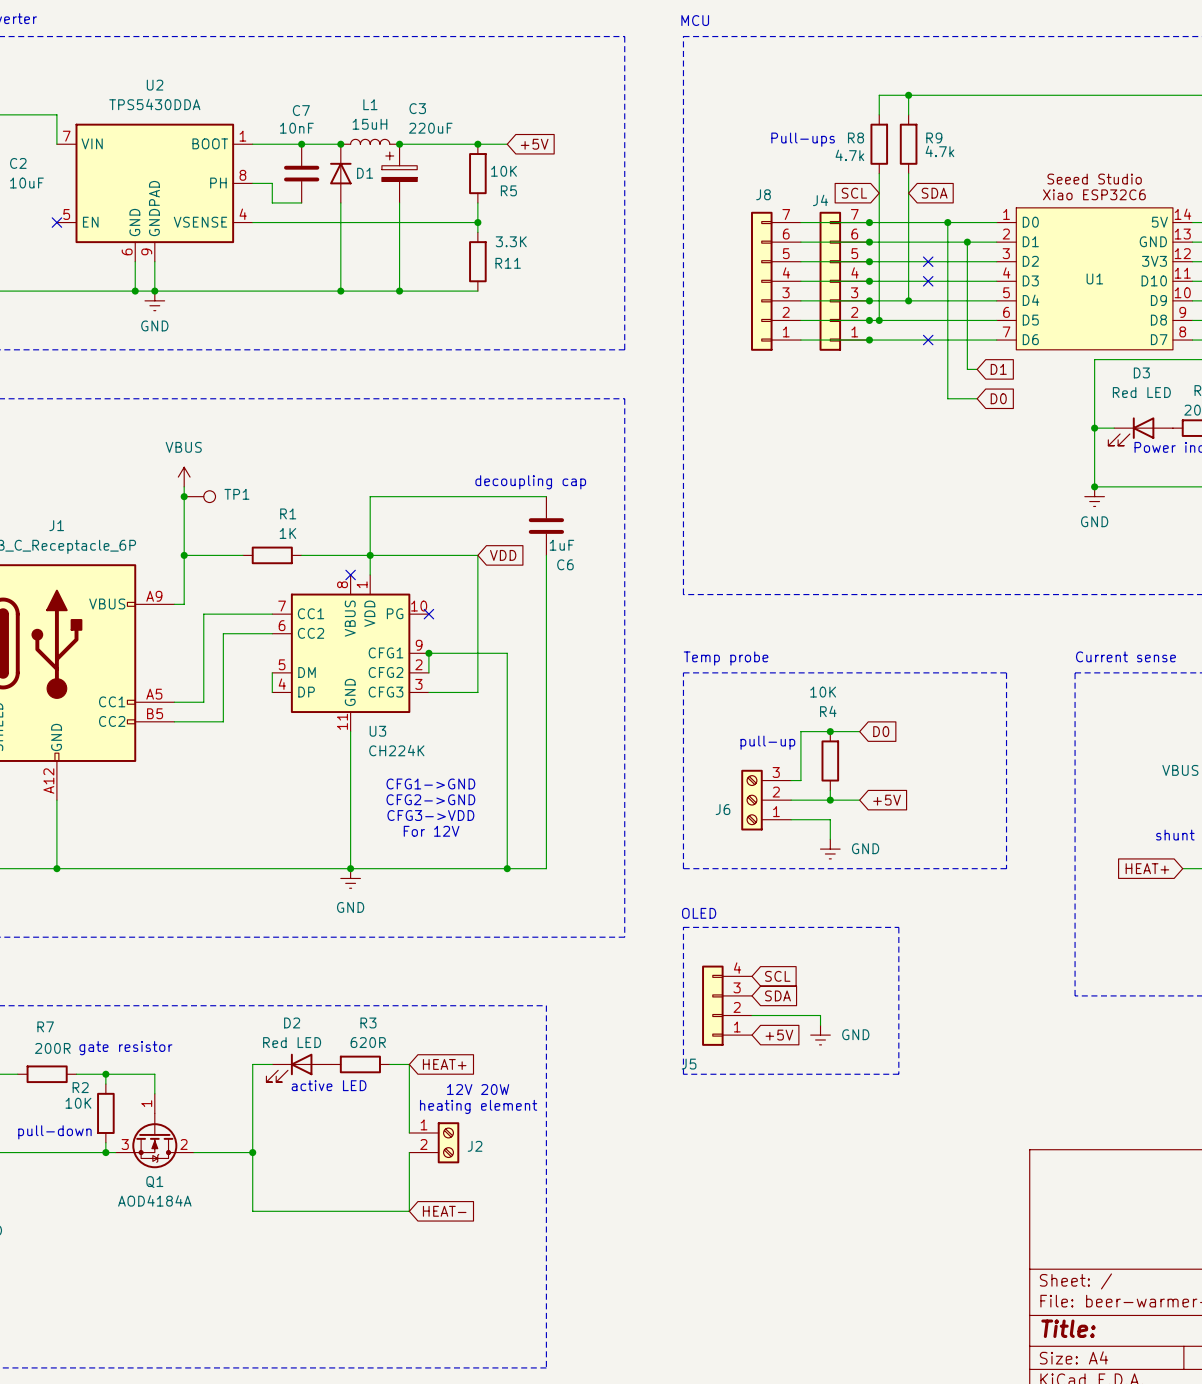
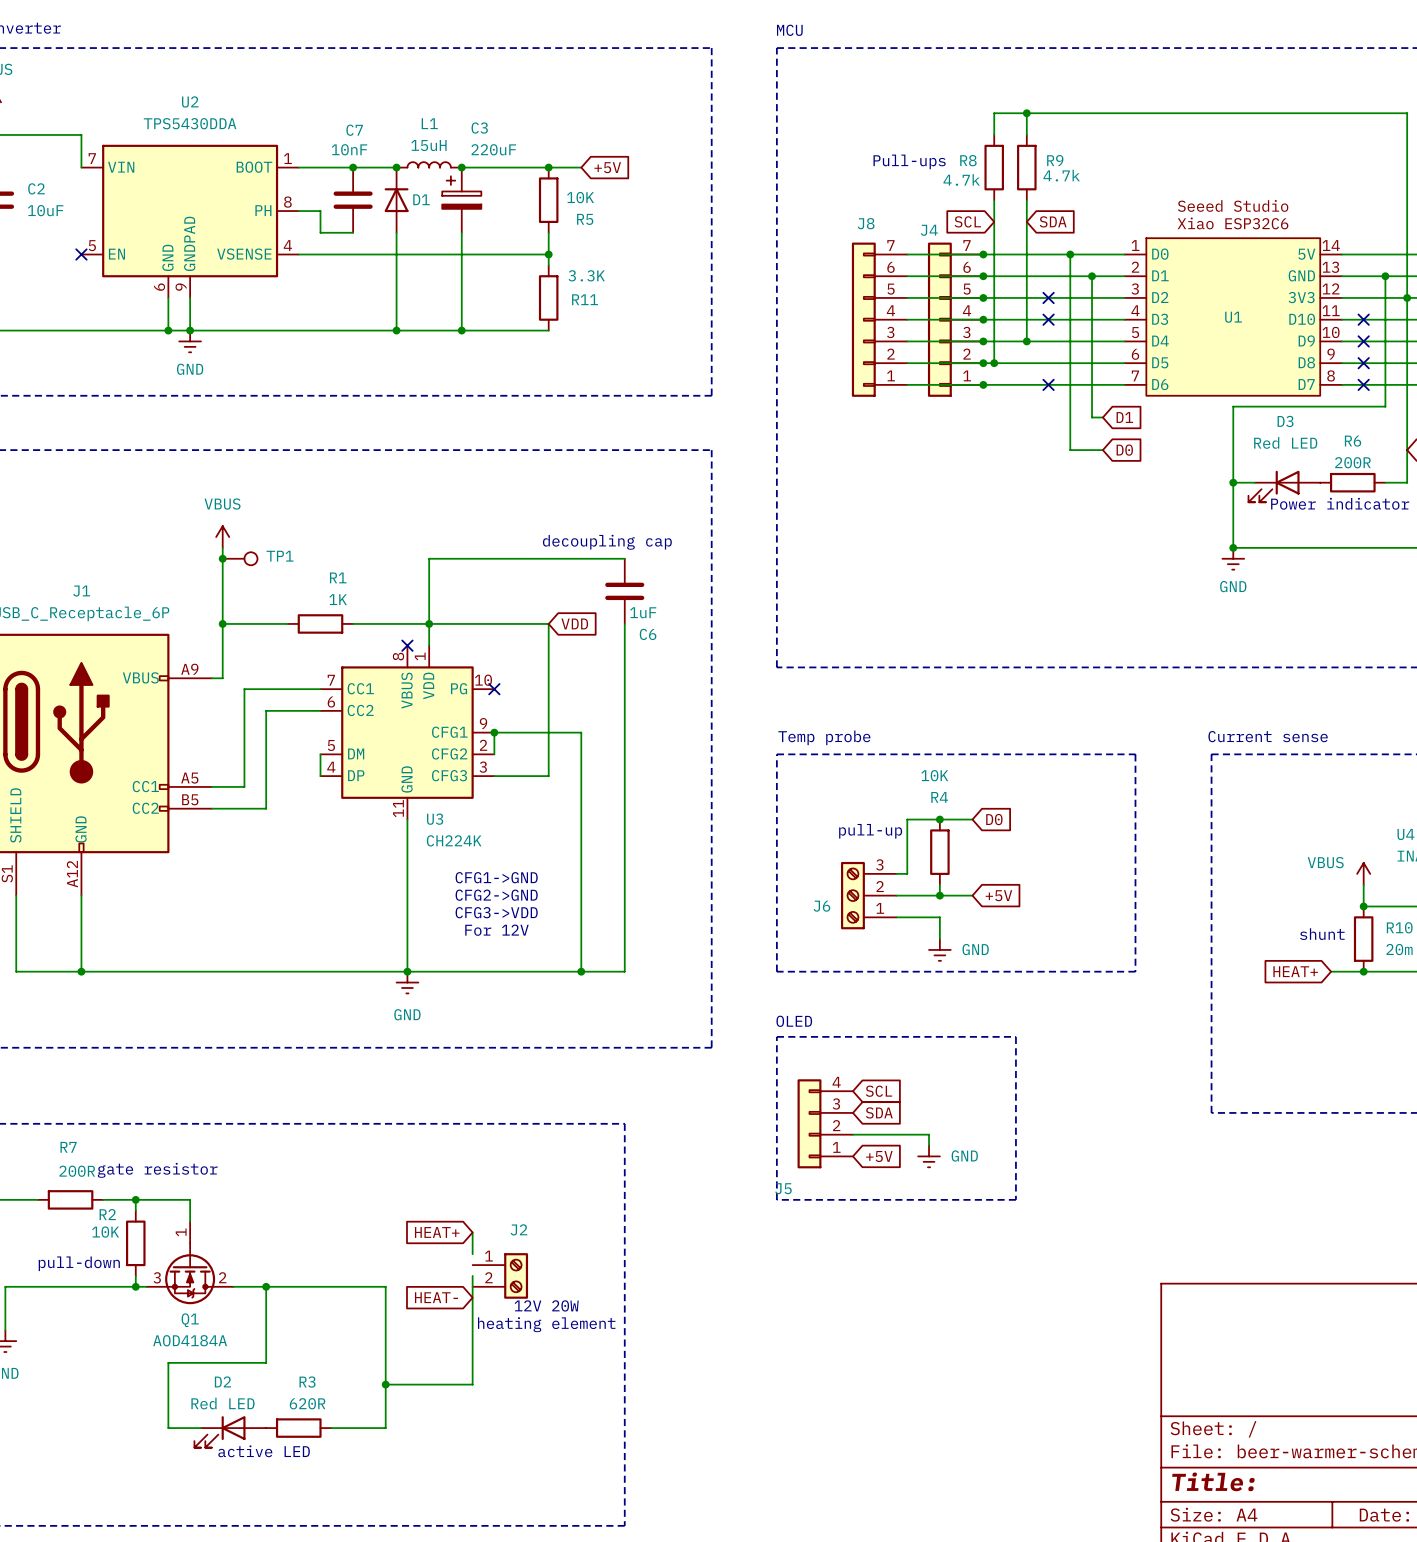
wire: (272, 1064) (252, 1064) (252, 1211) (409, 1211) -> (385, 1384) (472, 1384) (472, 1352)
R3 position: (360, 1064) -> (298, 1428)
wire: (389, 1064) (409, 1064) (409, 1103) -> none
global label rotation: 0° (444, 1064) -> 180° (437, 1232)
global label position: HEAT+ (444, 1064) -> HEAT+ (437, 1232)
D2 position: (298, 1067) -> (230, 1431)
text: active LED (329, 1085) -> none
text position: 12V 20W (478, 1089) -> 12V 20W (546, 1305)
text position: heating element (478, 1106) -> heating element (546, 1324)
wire: (409, 1123) (409, 1132) -> (472, 1275) (472, 1286)
J2 name position: J2 (475, 1146) -> J2 (519, 1229)
wire: none -> (266, 1286) (266, 1362) (168, 1362) (168, 1428) (200, 1428)
wire: none -> (298, 1286) (385, 1286) (385, 1428) (331, 1428)
junction position: (252, 1152) -> (266, 1286)
global label rotation: 0° (444, 1211) -> 180° (436, 1297)
global label position: HEAT- (444, 1211) -> HEAT- (436, 1297)
junction: none -> (385, 1384)
text: none -> active LED (264, 1451)

